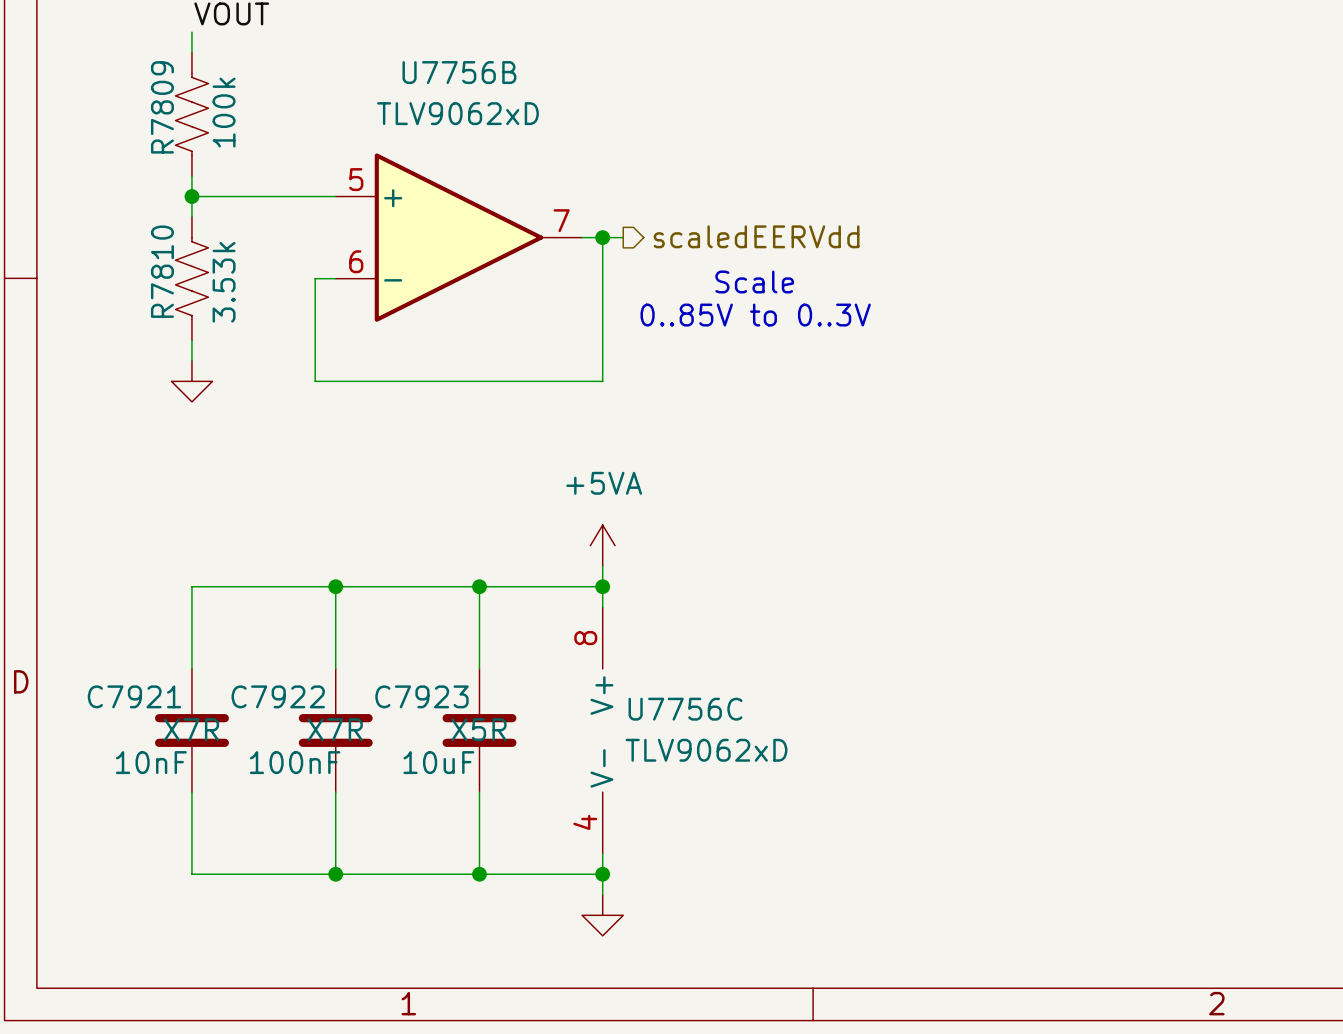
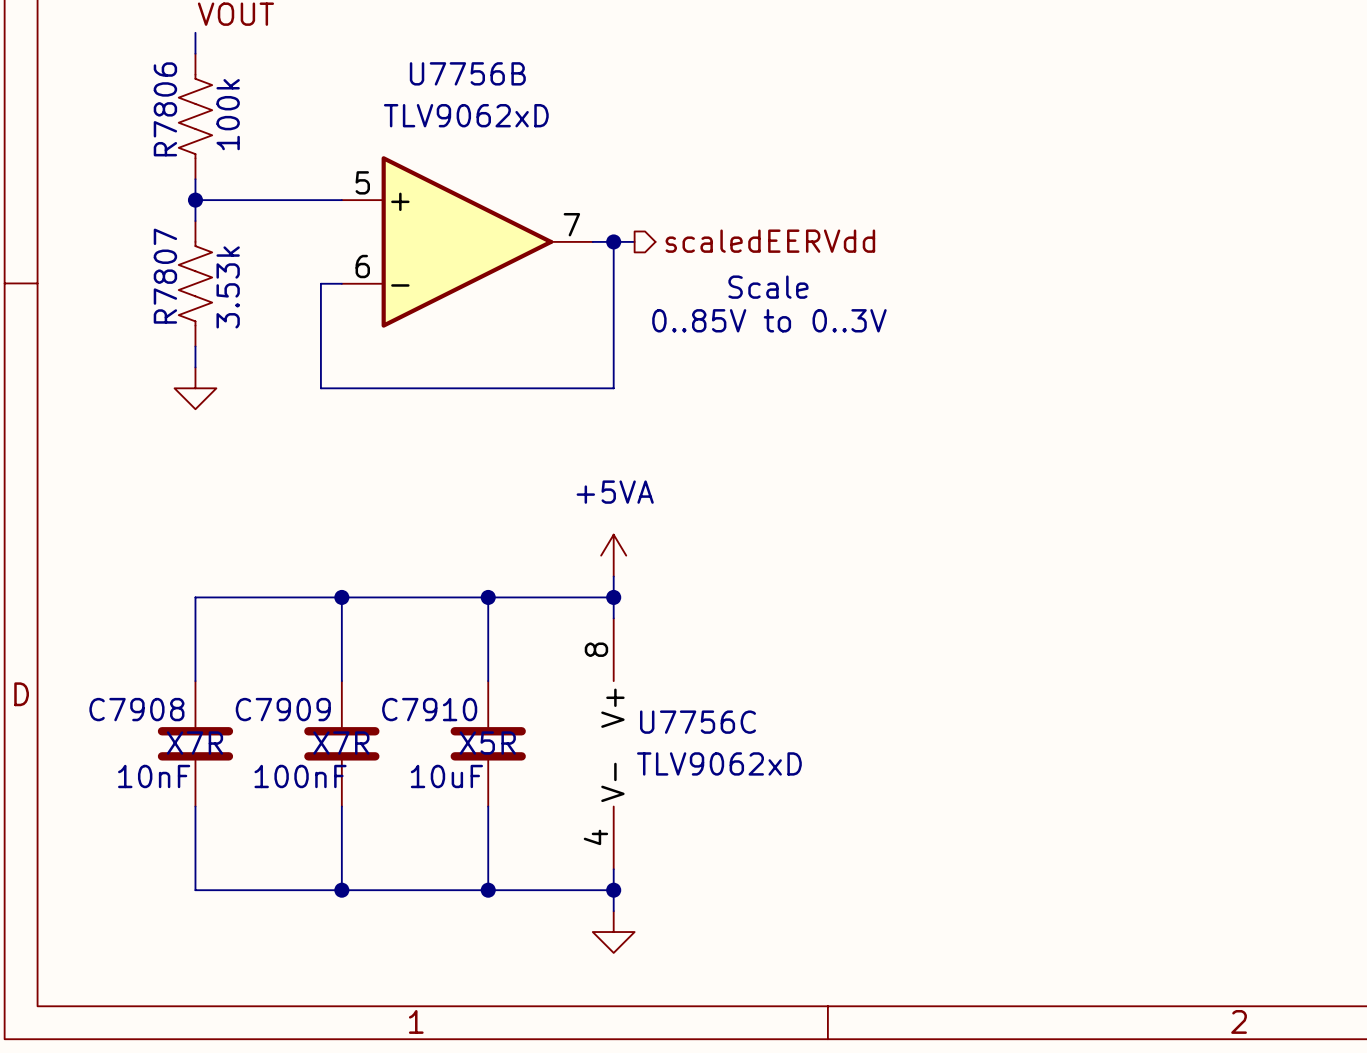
R7809 name: R7809 (162, 107) -> R7806 (165, 109)
R7810 name: R7810 (162, 271) -> R7807 (165, 276)
C7921 name: C7921 (134, 696) -> C7908 (136, 709)
C7922 name: C7922 (278, 696) -> C7909 (283, 709)
C7923 name: C7923 (421, 696) -> C7910 (429, 709)

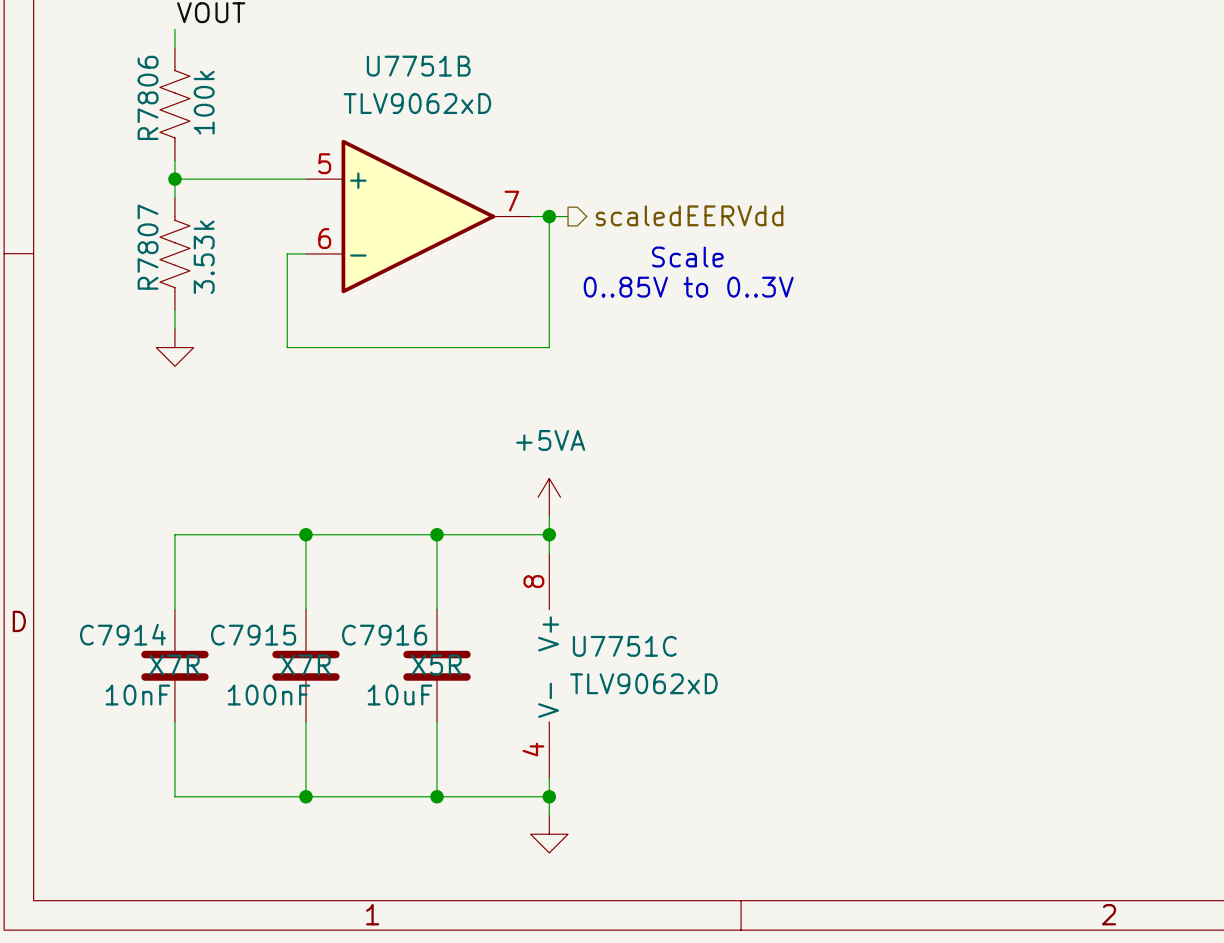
U7756B name: U7756B (467, 73) -> U7751B (418, 66)
C7908 name: C7908 (136, 709) -> C7914 (122, 634)
C7909 name: C7909 (283, 709) -> C7915 (253, 635)
C7910 name: C7910 (429, 709) -> C7916 (384, 635)
U7756C name: U7756C (698, 722) -> U7751C (624, 646)

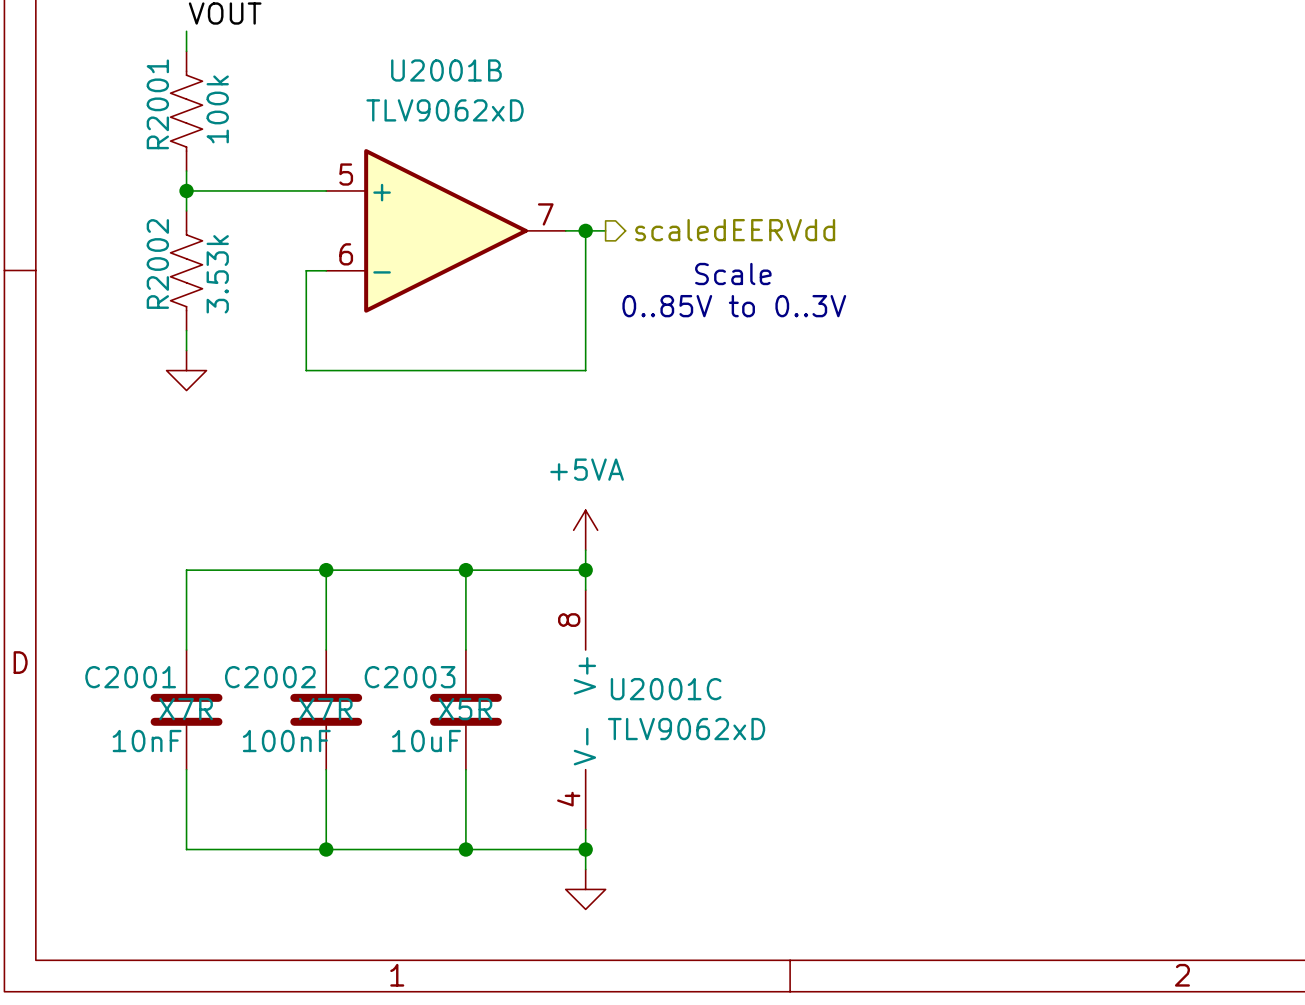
U7751B name: U7751B (418, 66) -> U2001B (446, 70)
R7806 name: R7806 (148, 97) -> R2001 (157, 104)
R7807 name: R7807 (148, 247) -> R2002 (157, 264)
C7914 name: C7914 (122, 634) -> C2001 (130, 677)
C7915 name: C7915 (253, 635) -> C2002 (270, 677)
C7916 name: C7916 (384, 635) -> C2003 (410, 677)
U7751C name: U7751C (624, 646) -> U2001C (666, 689)

